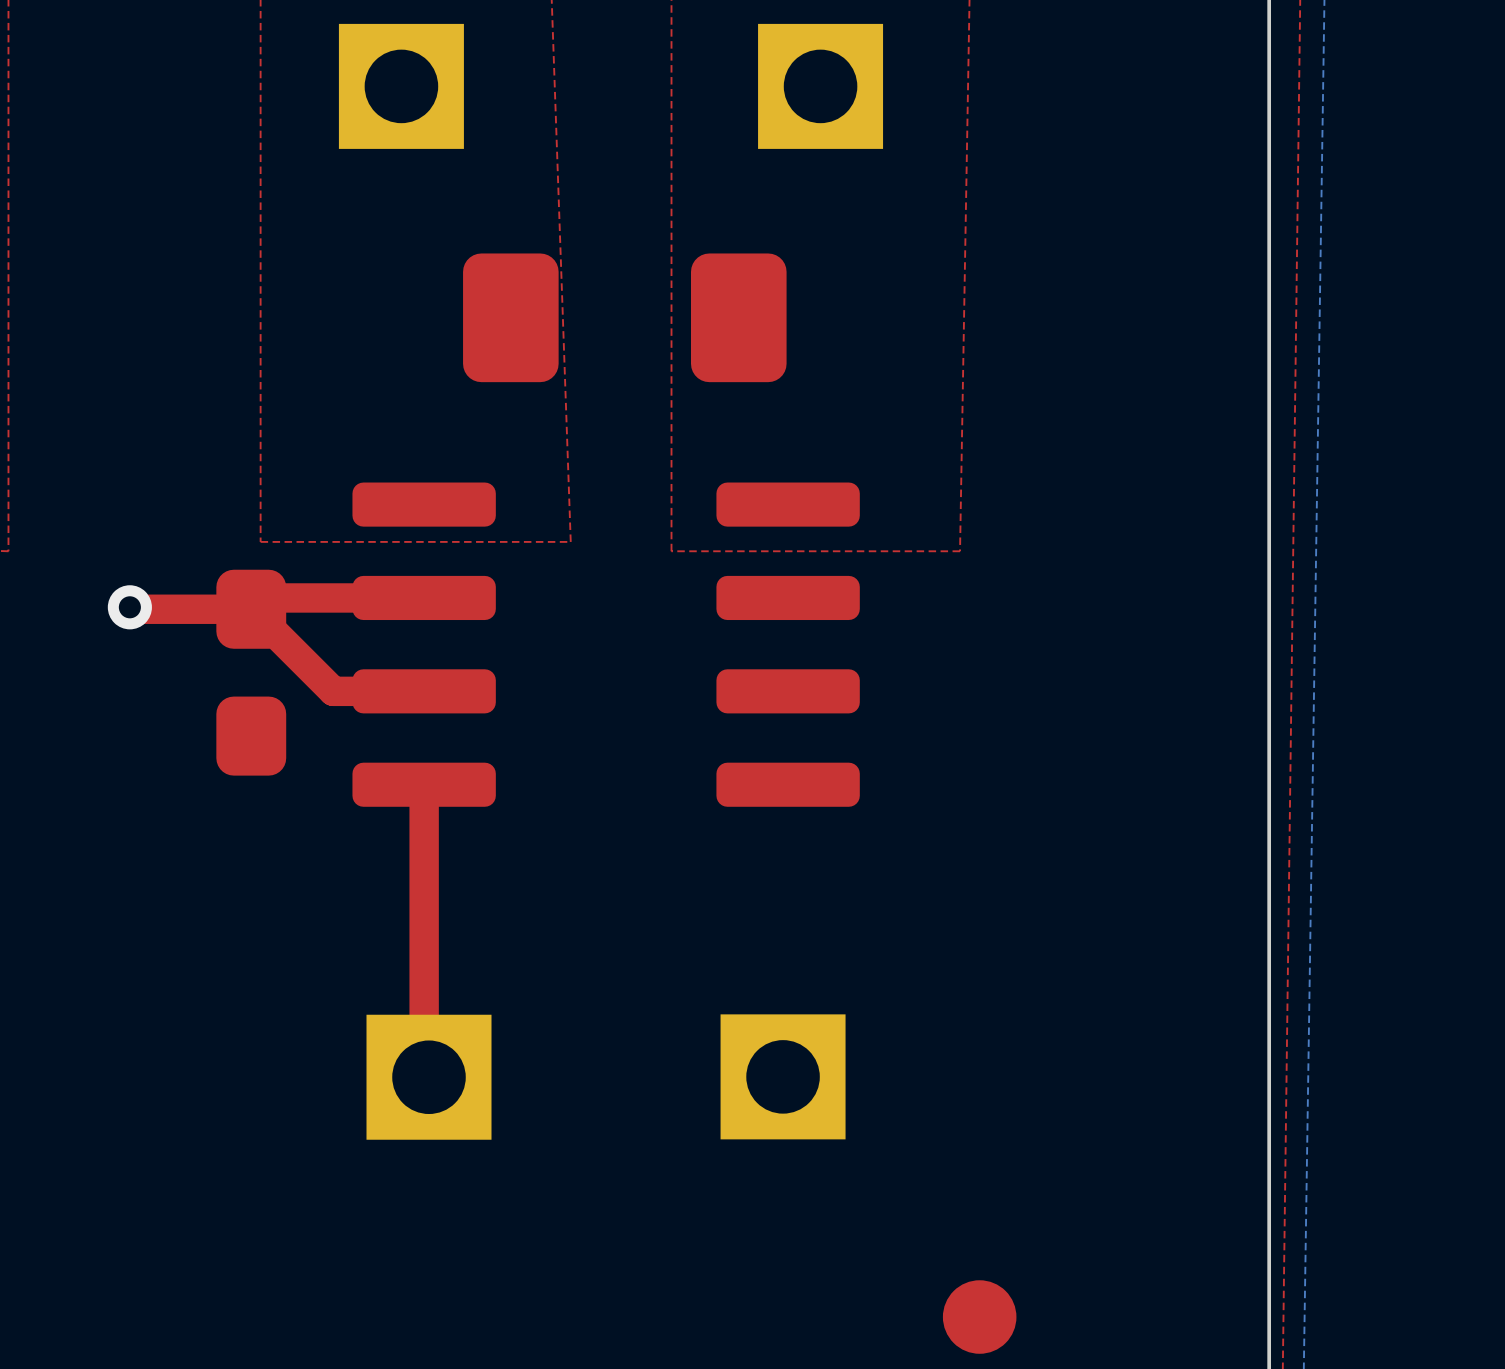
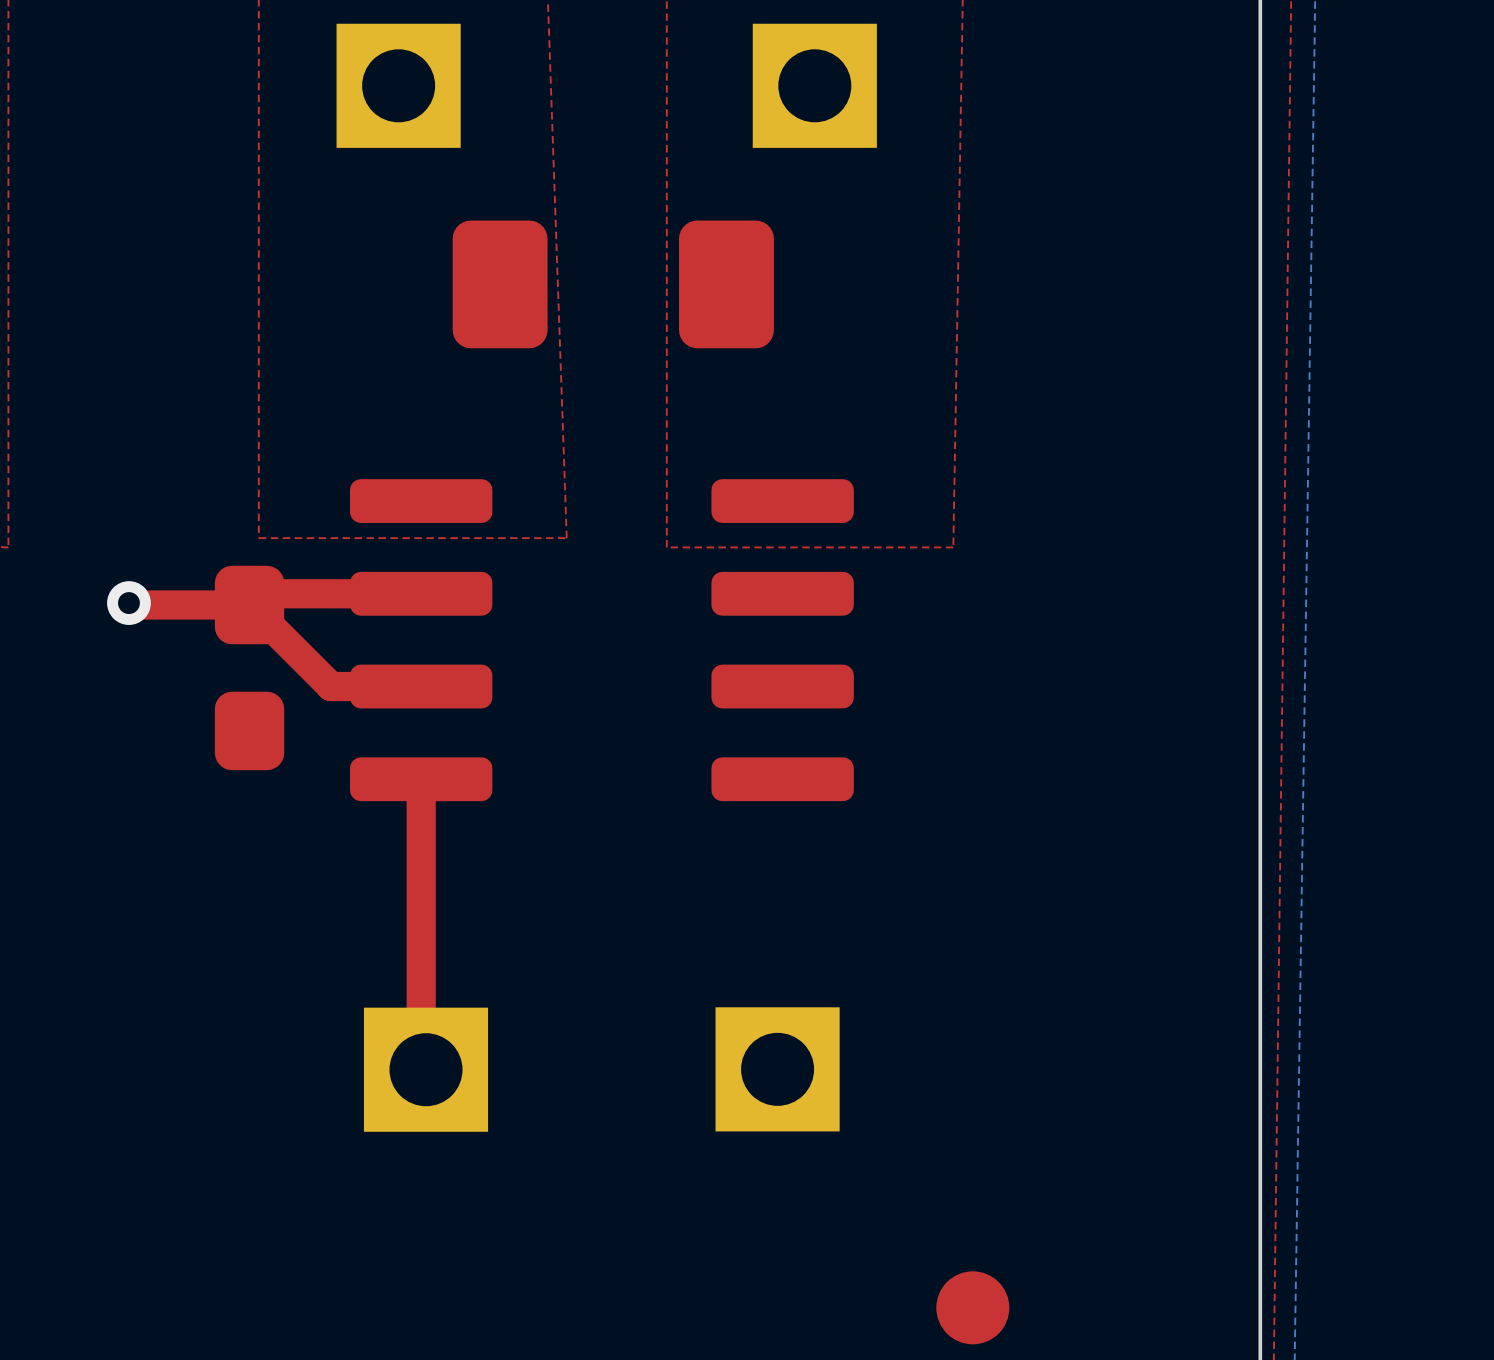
part position: (624, 317) -> (613, 284)

